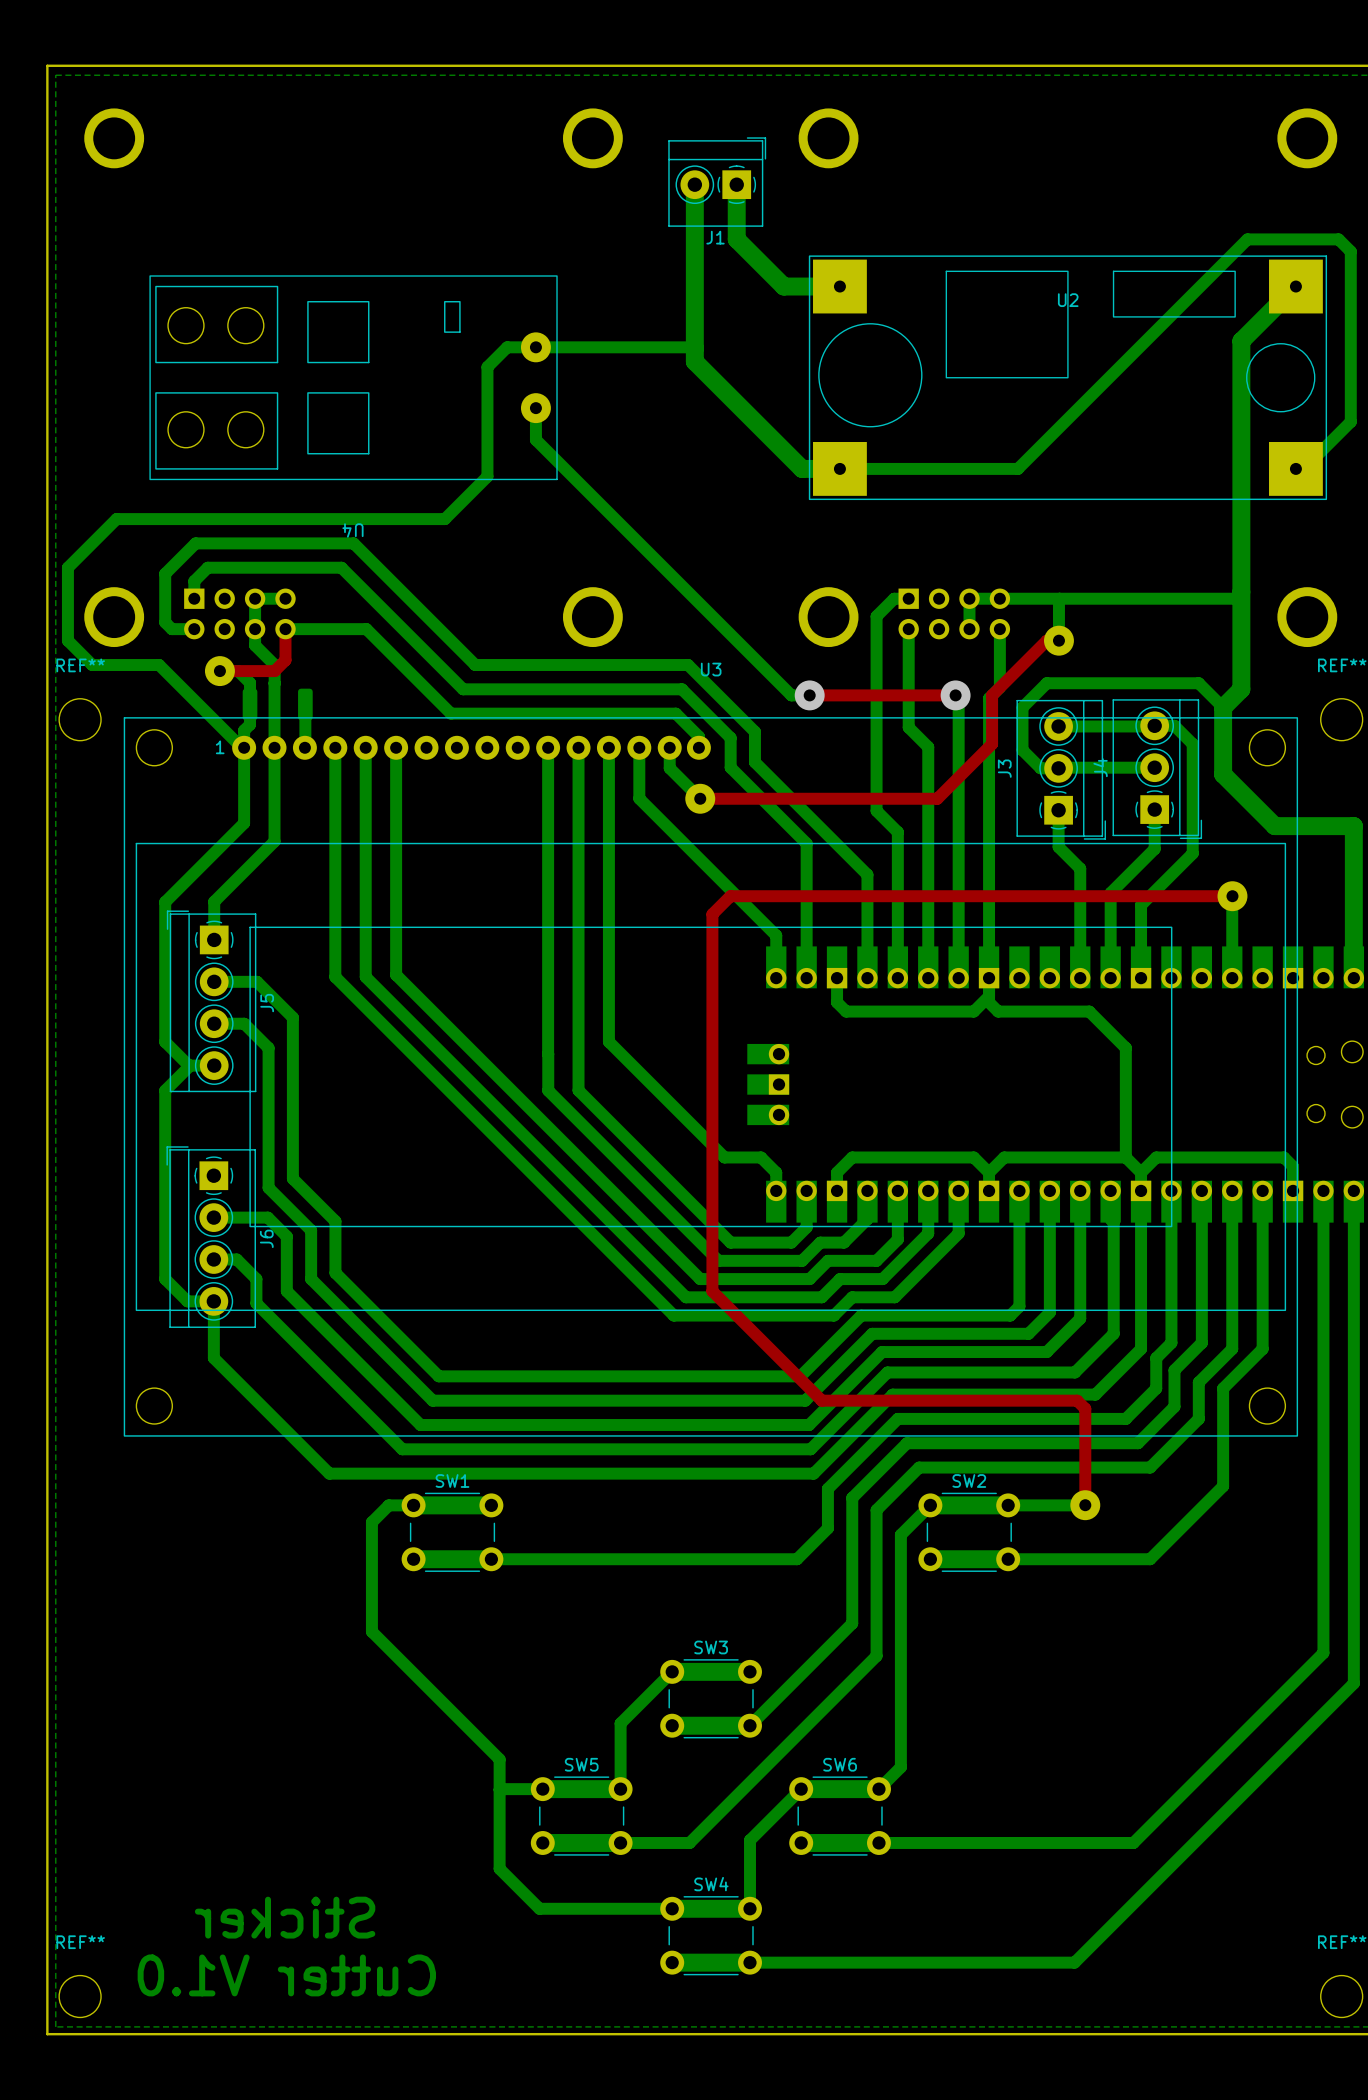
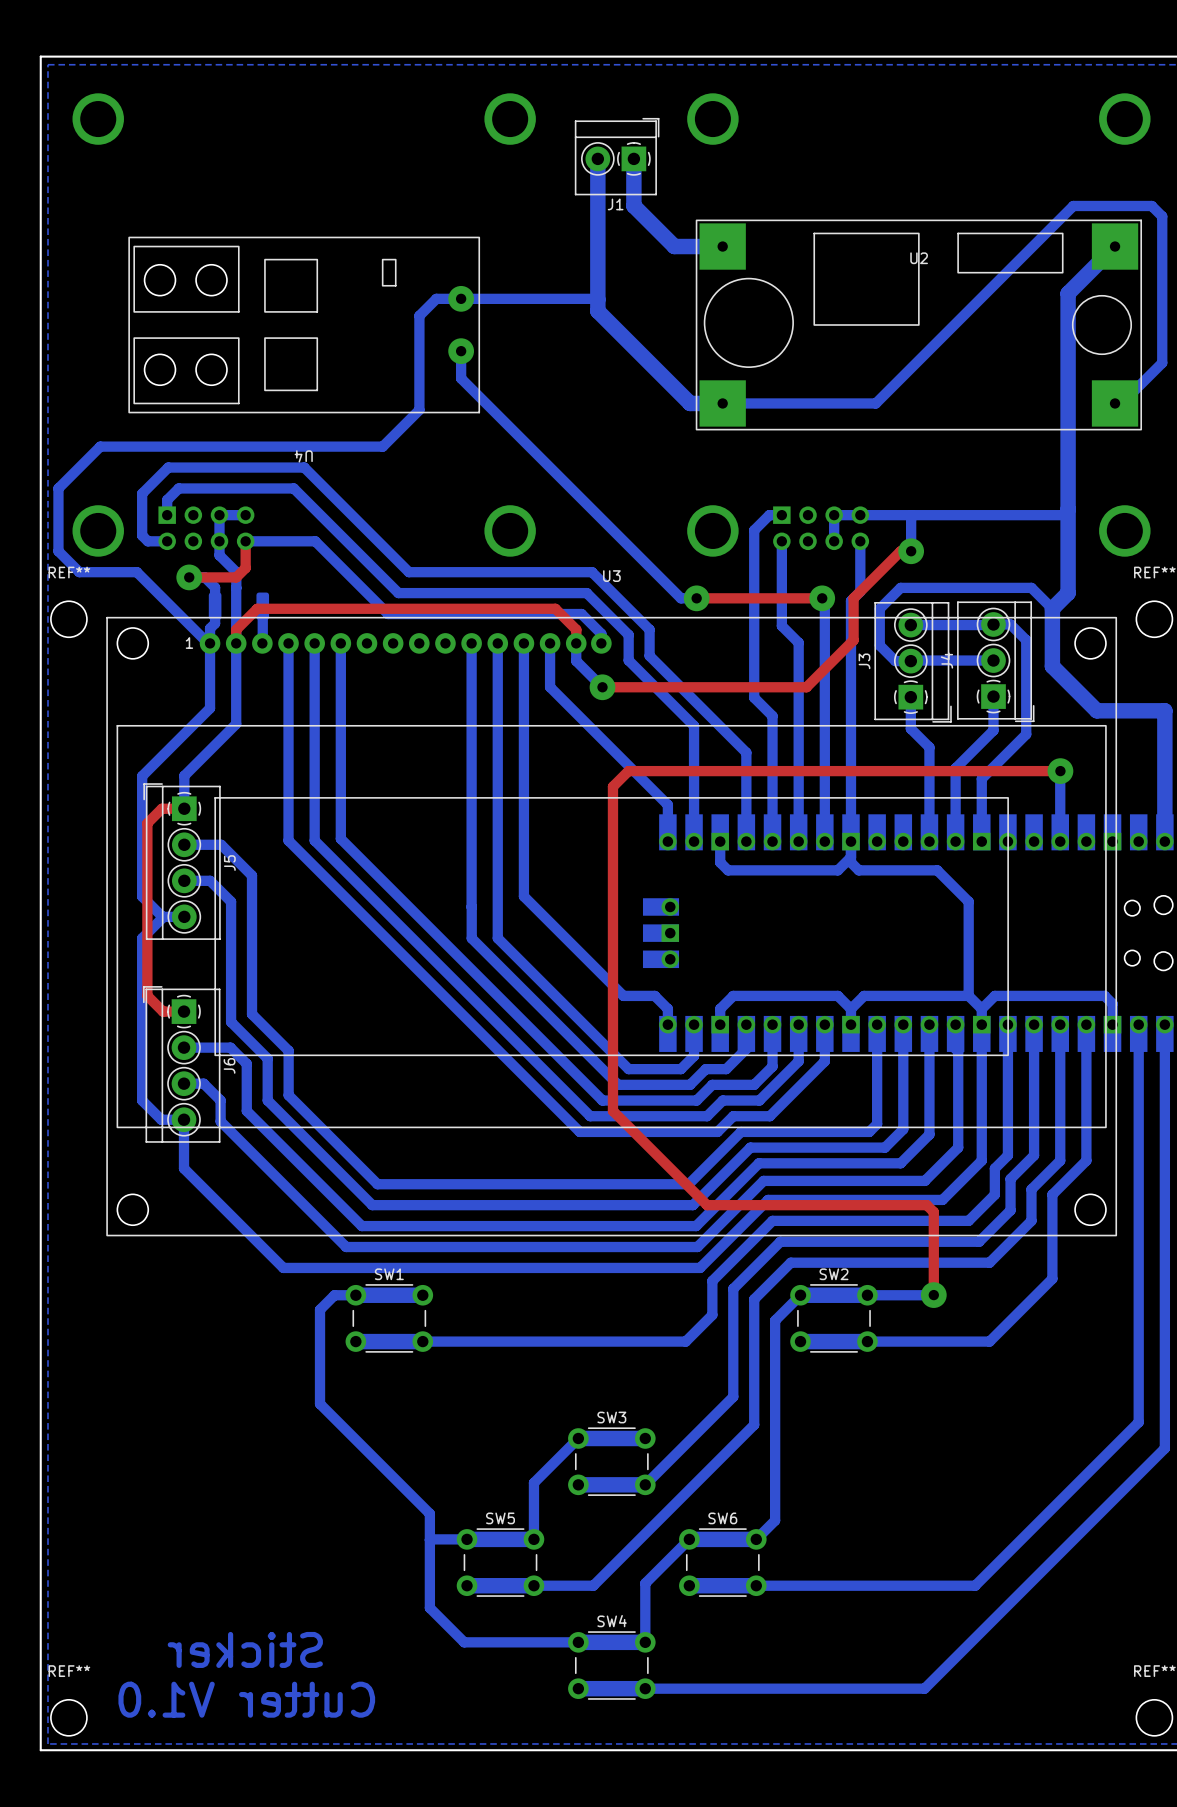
top track: none -> (576, 643) (576, 629) (555, 608) (257, 608) (236, 629) (236, 643)
top track: none -> (184, 808) (161, 808) (147, 823) (147, 995) (163, 1011) (184, 1011)

